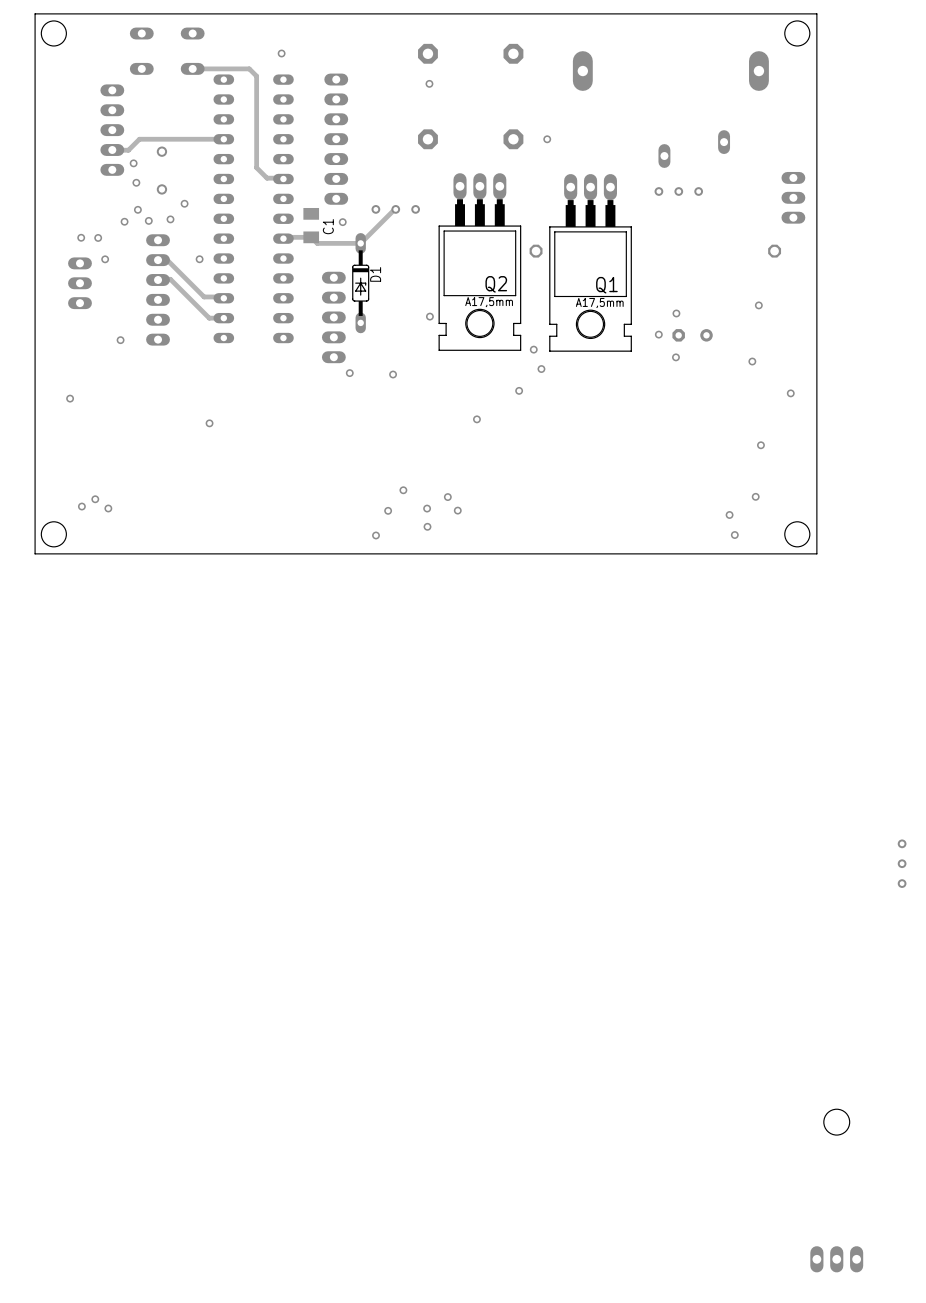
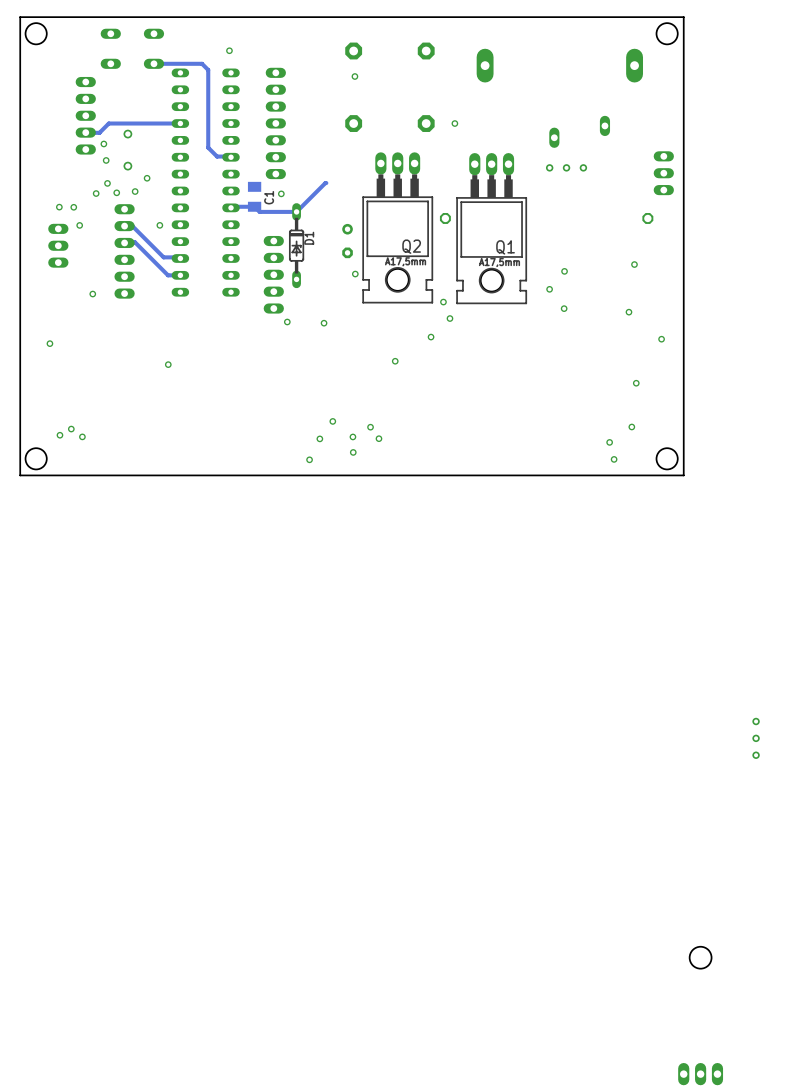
part: (395, 209) -> none
part: none -> (347, 241)
part: (692, 335) -> none

